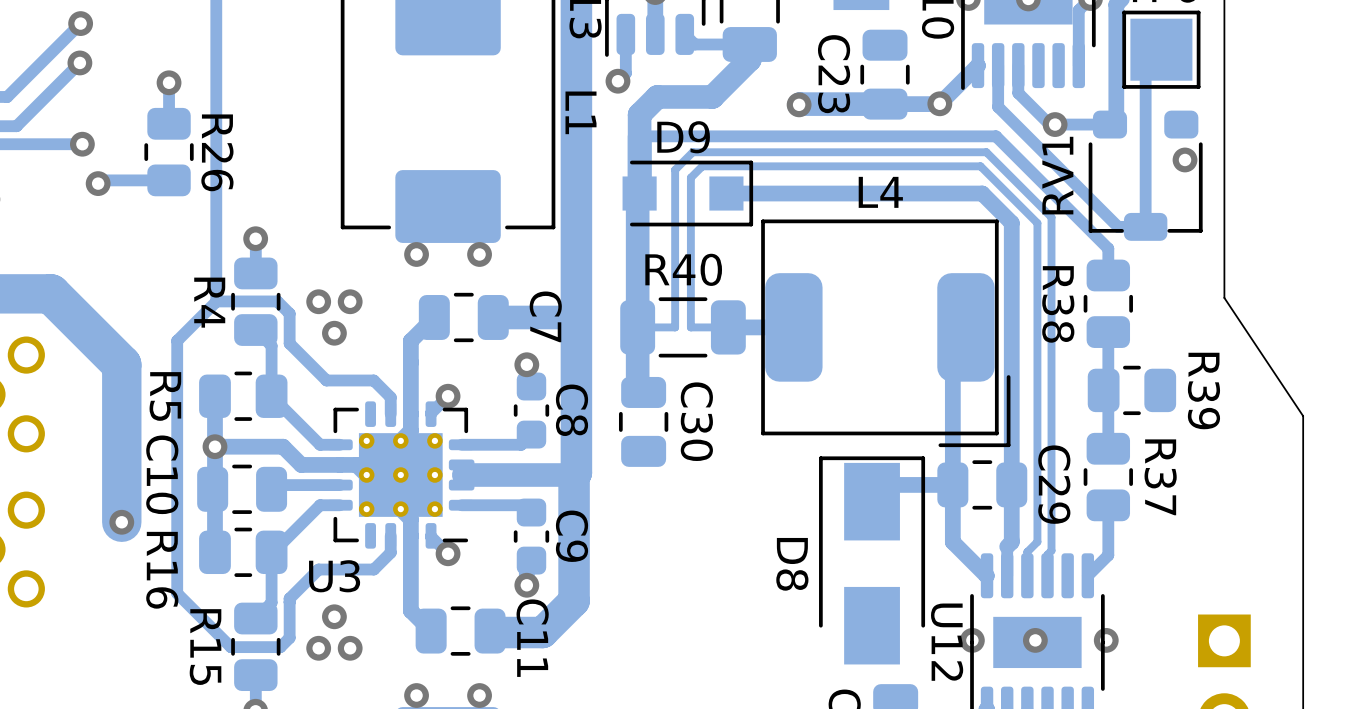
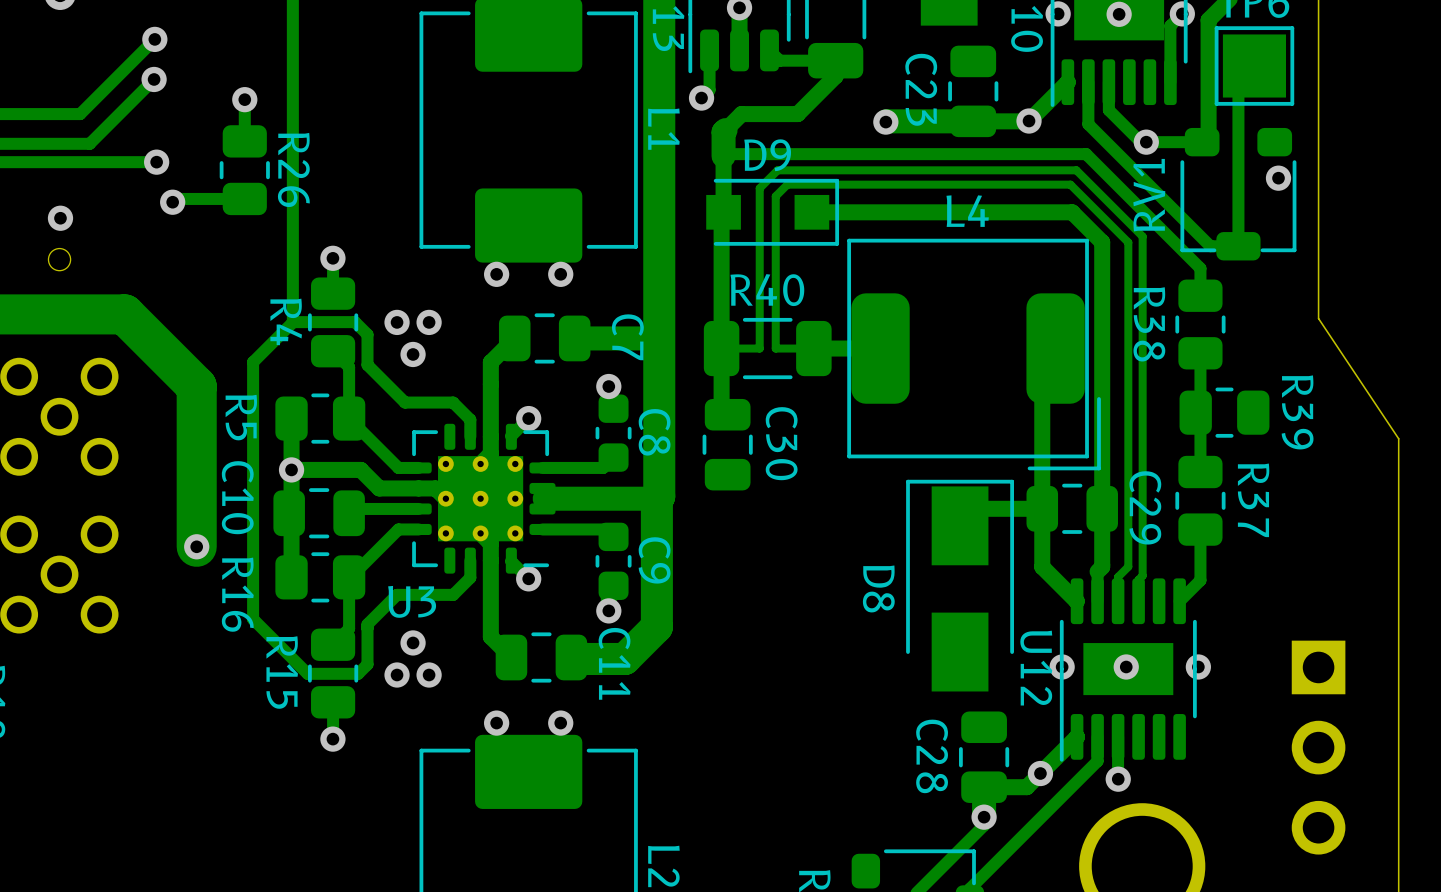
track width: thick (749, 44) (749, 59) (712, 96) (657, 96) (641, 112) -> thin (835, 60) (835, 76) (797, 114) (741, 114) (725, 130)
track width: thick (639, 138) (637, 386) -> thin (723, 156) (723, 212) (721, 214) (721, 408)

